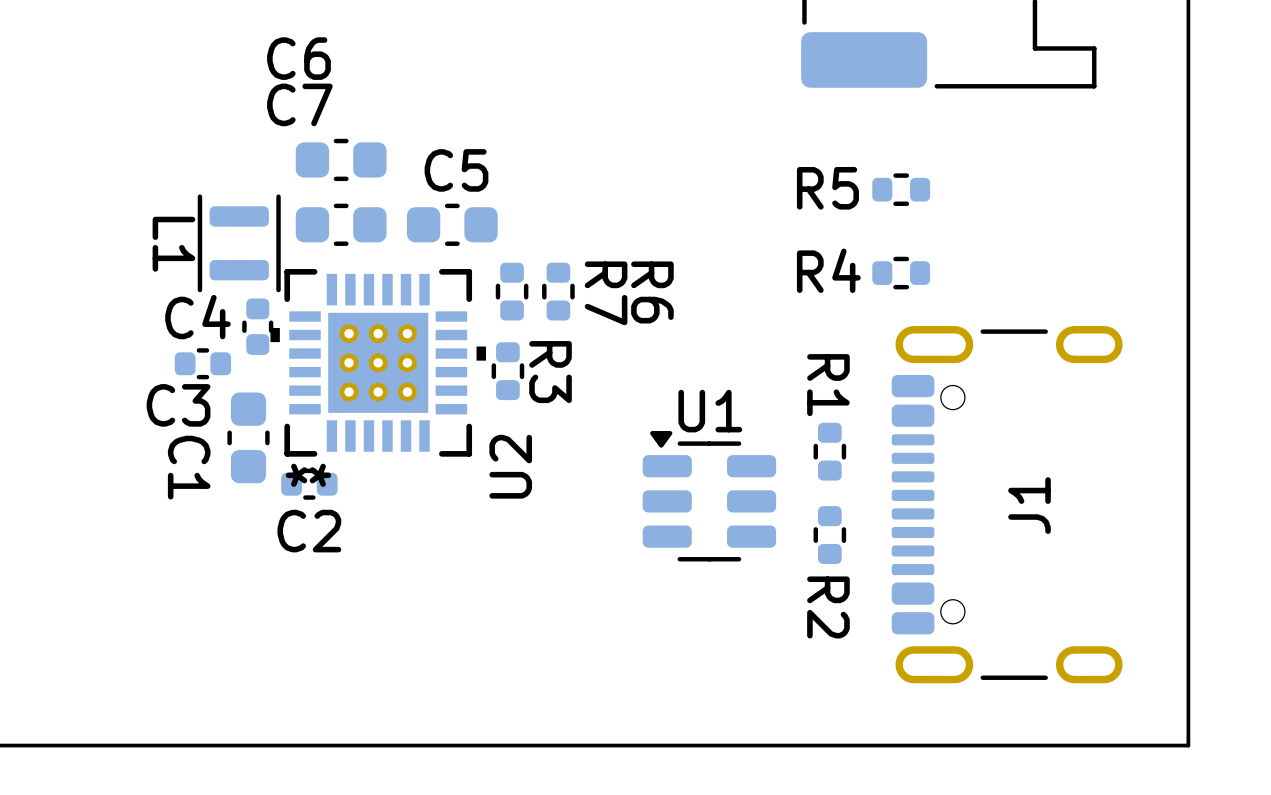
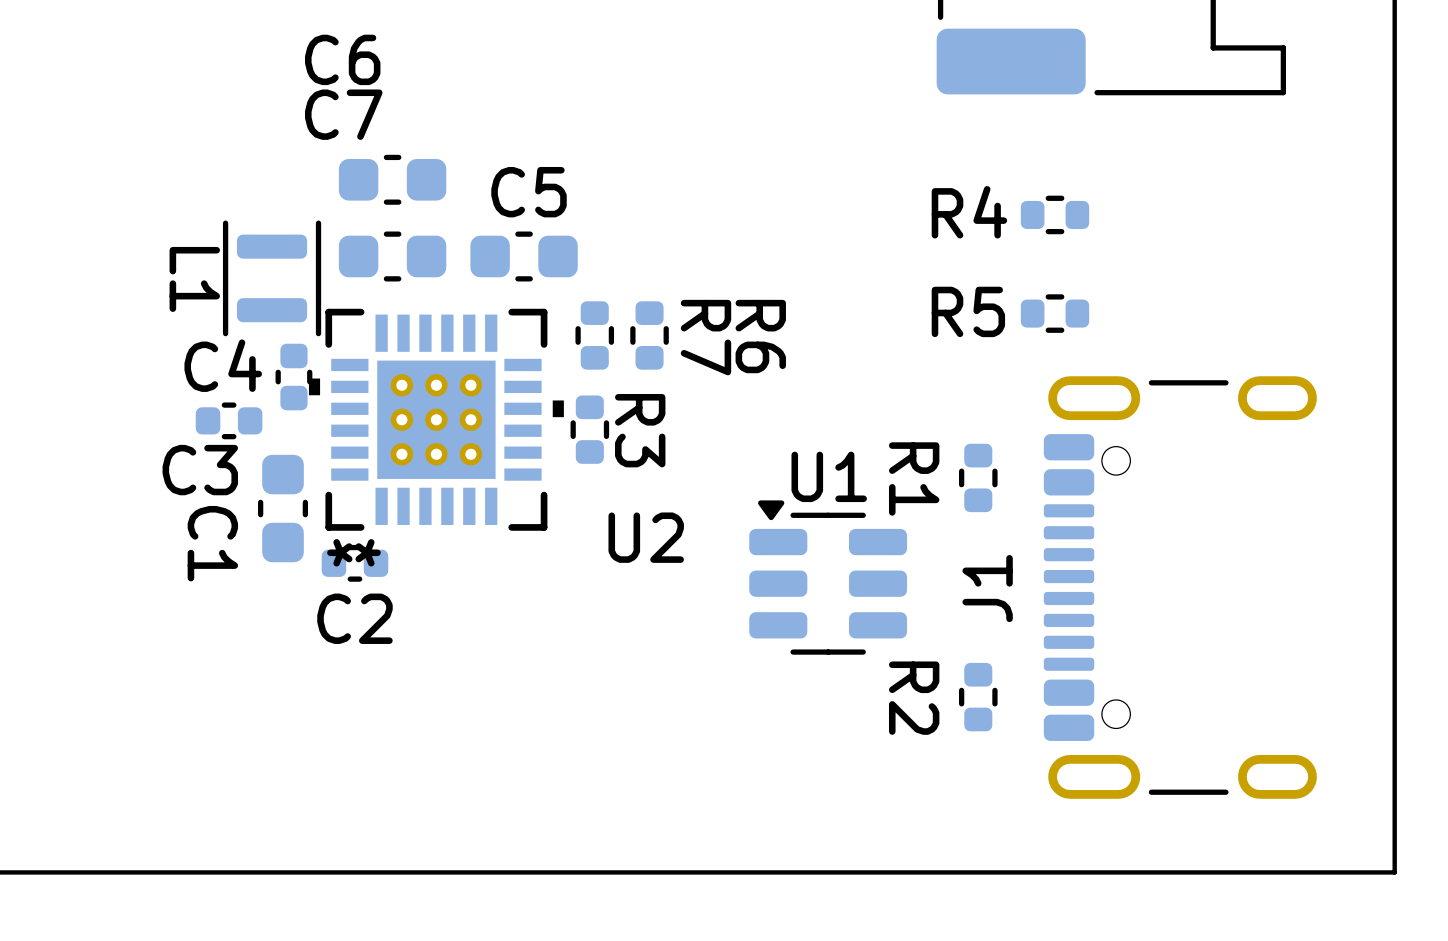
R5 name: R5 (827, 188) -> R4 (969, 212)
R4 name: R4 (828, 270) -> R5 (968, 311)
R1 name position: R1 (828, 385) -> R1 (914, 478)
R1 position: (829, 451) -> (978, 477)
U2 name rotation: 0° (510, 466) -> 90° clockwise (646, 537)
J1 name position: J1 (1029, 505) -> J1 (987, 588)
R2 position: (829, 535) -> (978, 697)
R2 name position: R2 (828, 607) -> R2 (914, 698)

